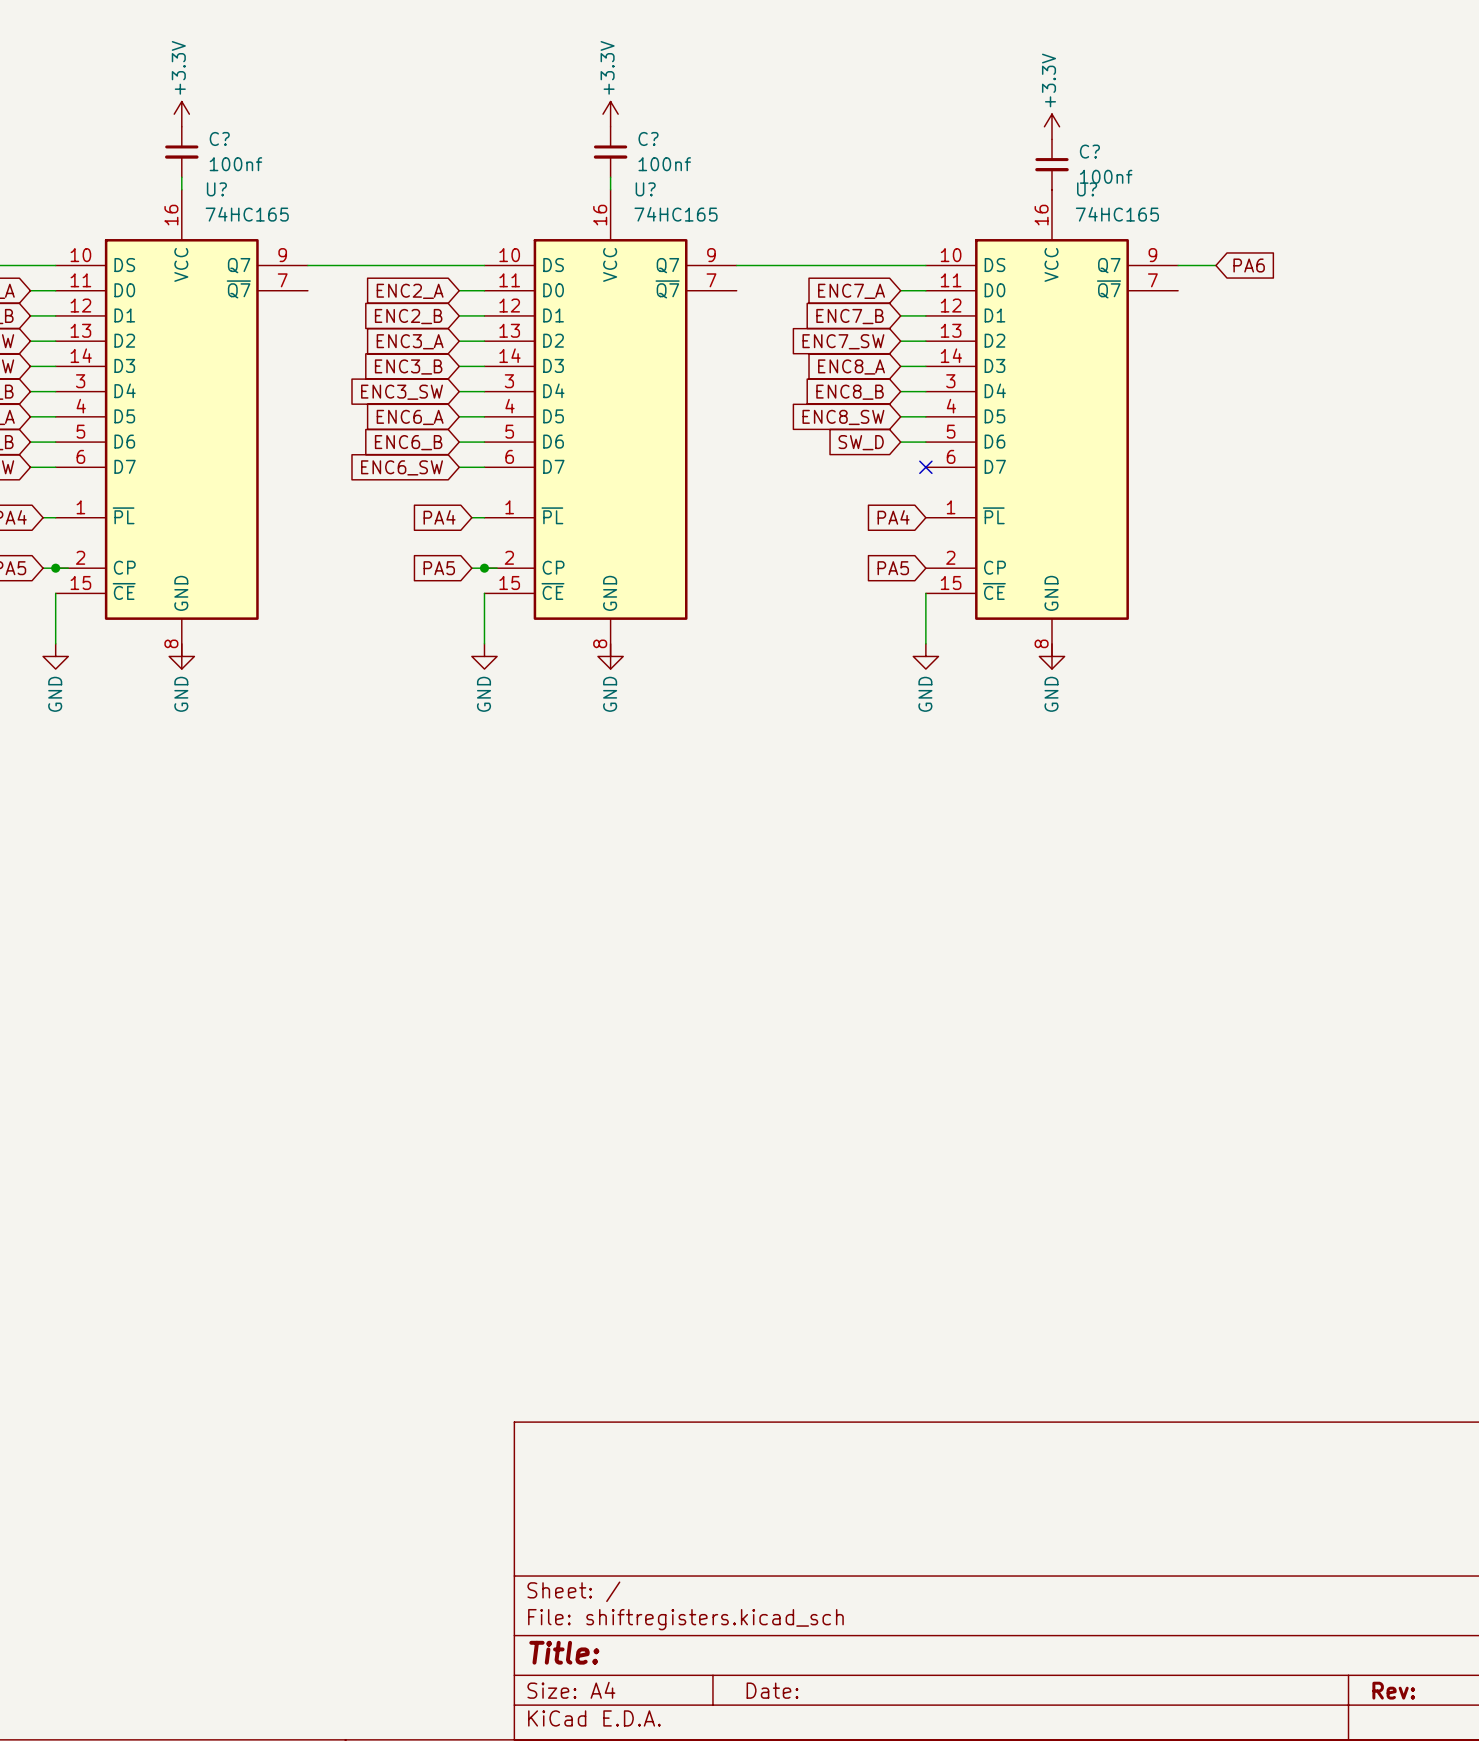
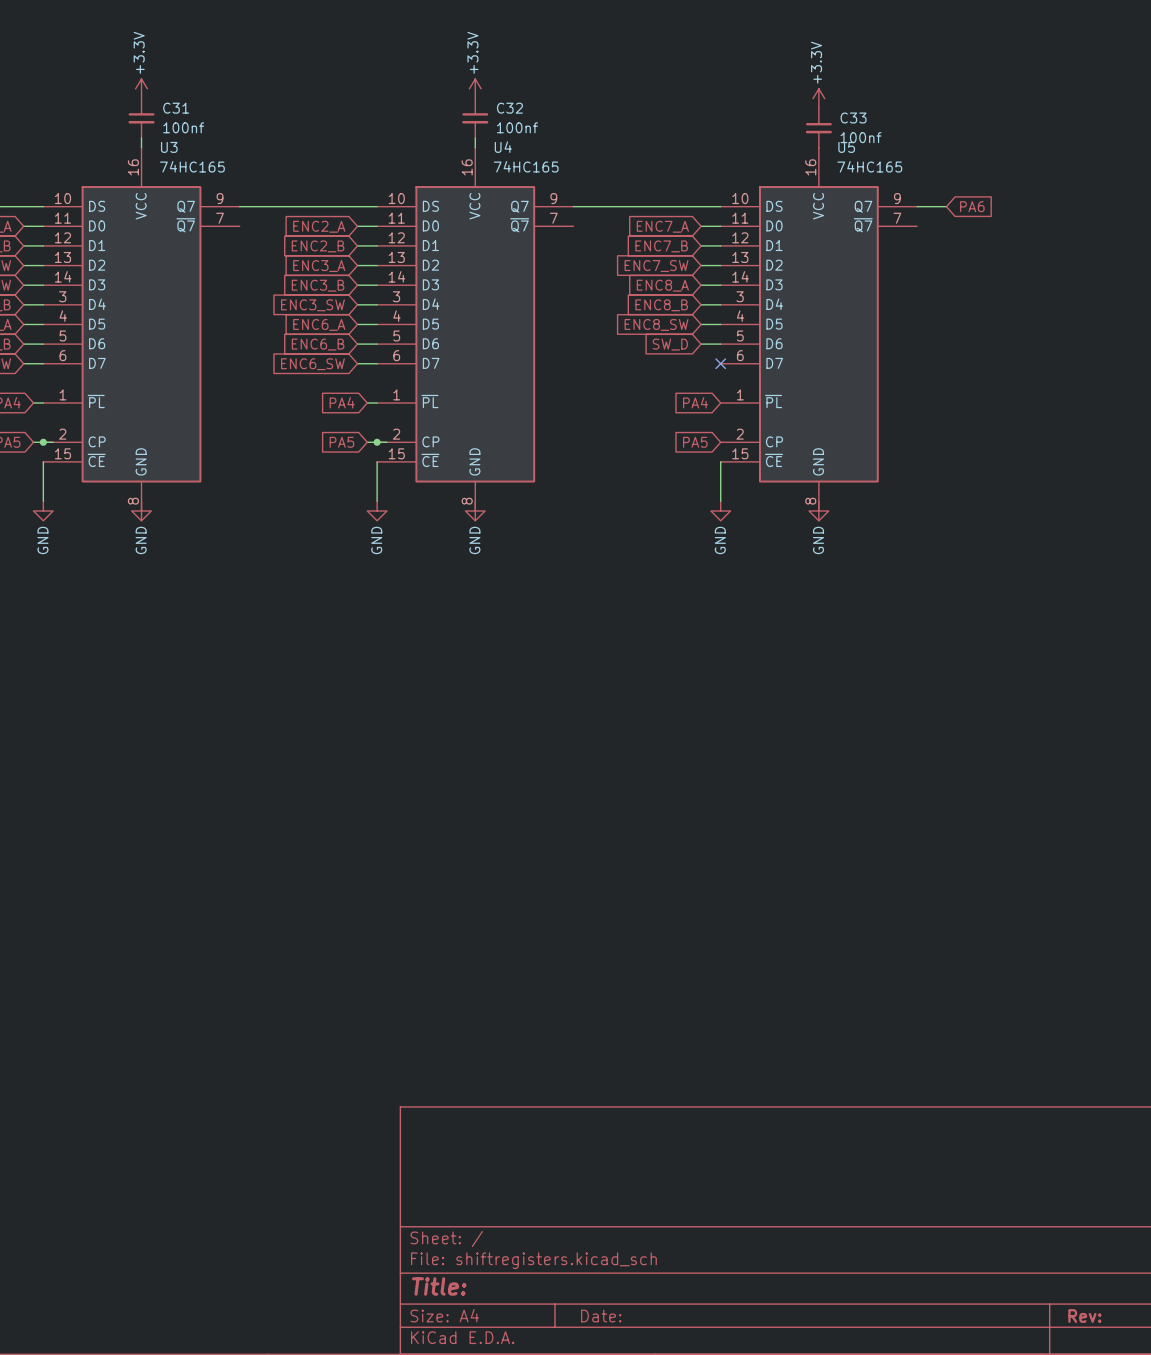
C? name: C? (219, 138) -> C31 (176, 108)
C? name: C? (648, 138) -> C32 (509, 108)
C? name: C? (1089, 151) -> C33 (853, 118)
U? name: U? (216, 189) -> U3 (169, 147)
U? name: U? (645, 189) -> U4 (503, 147)
U? name: U? (1087, 189) -> U5 (846, 147)

